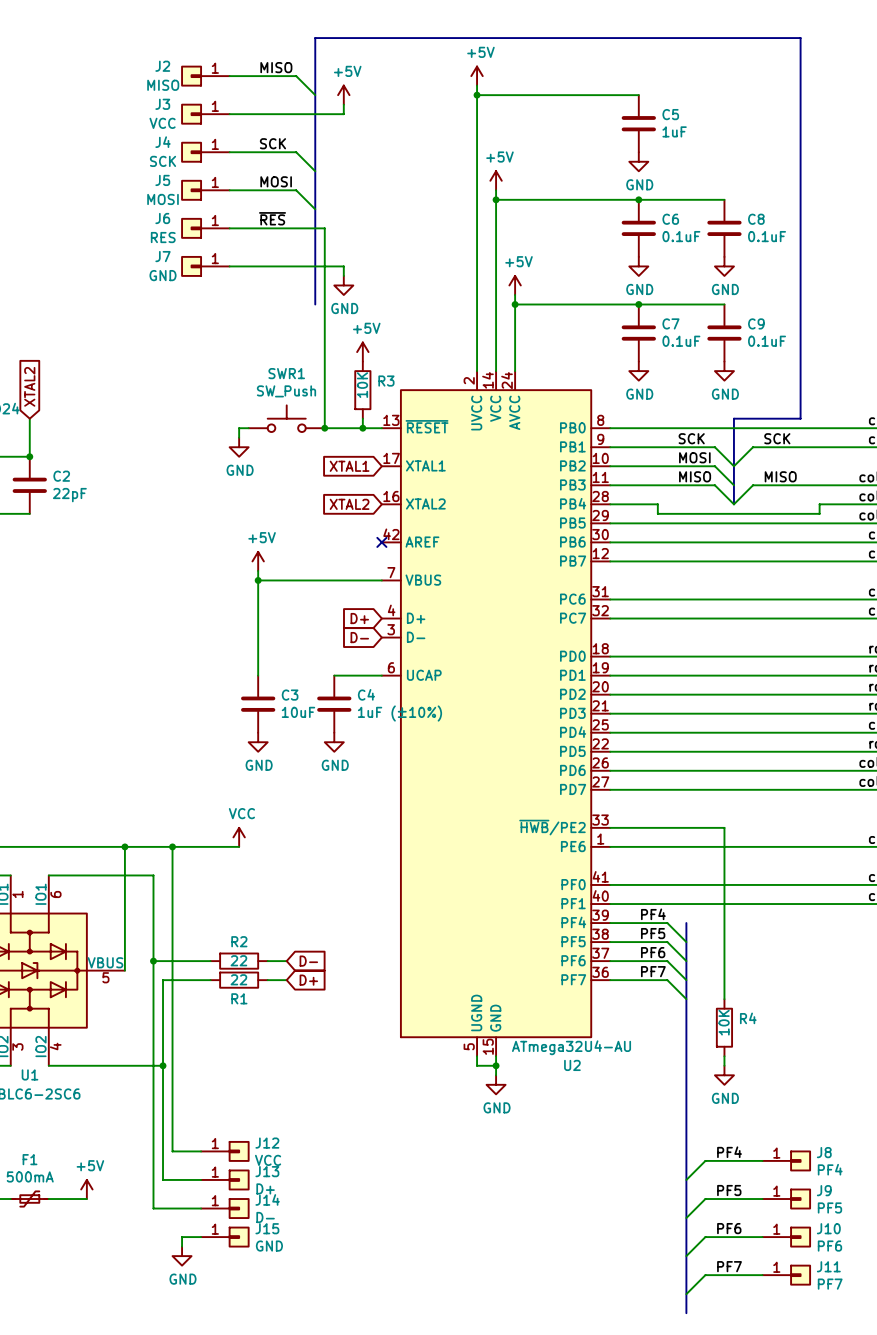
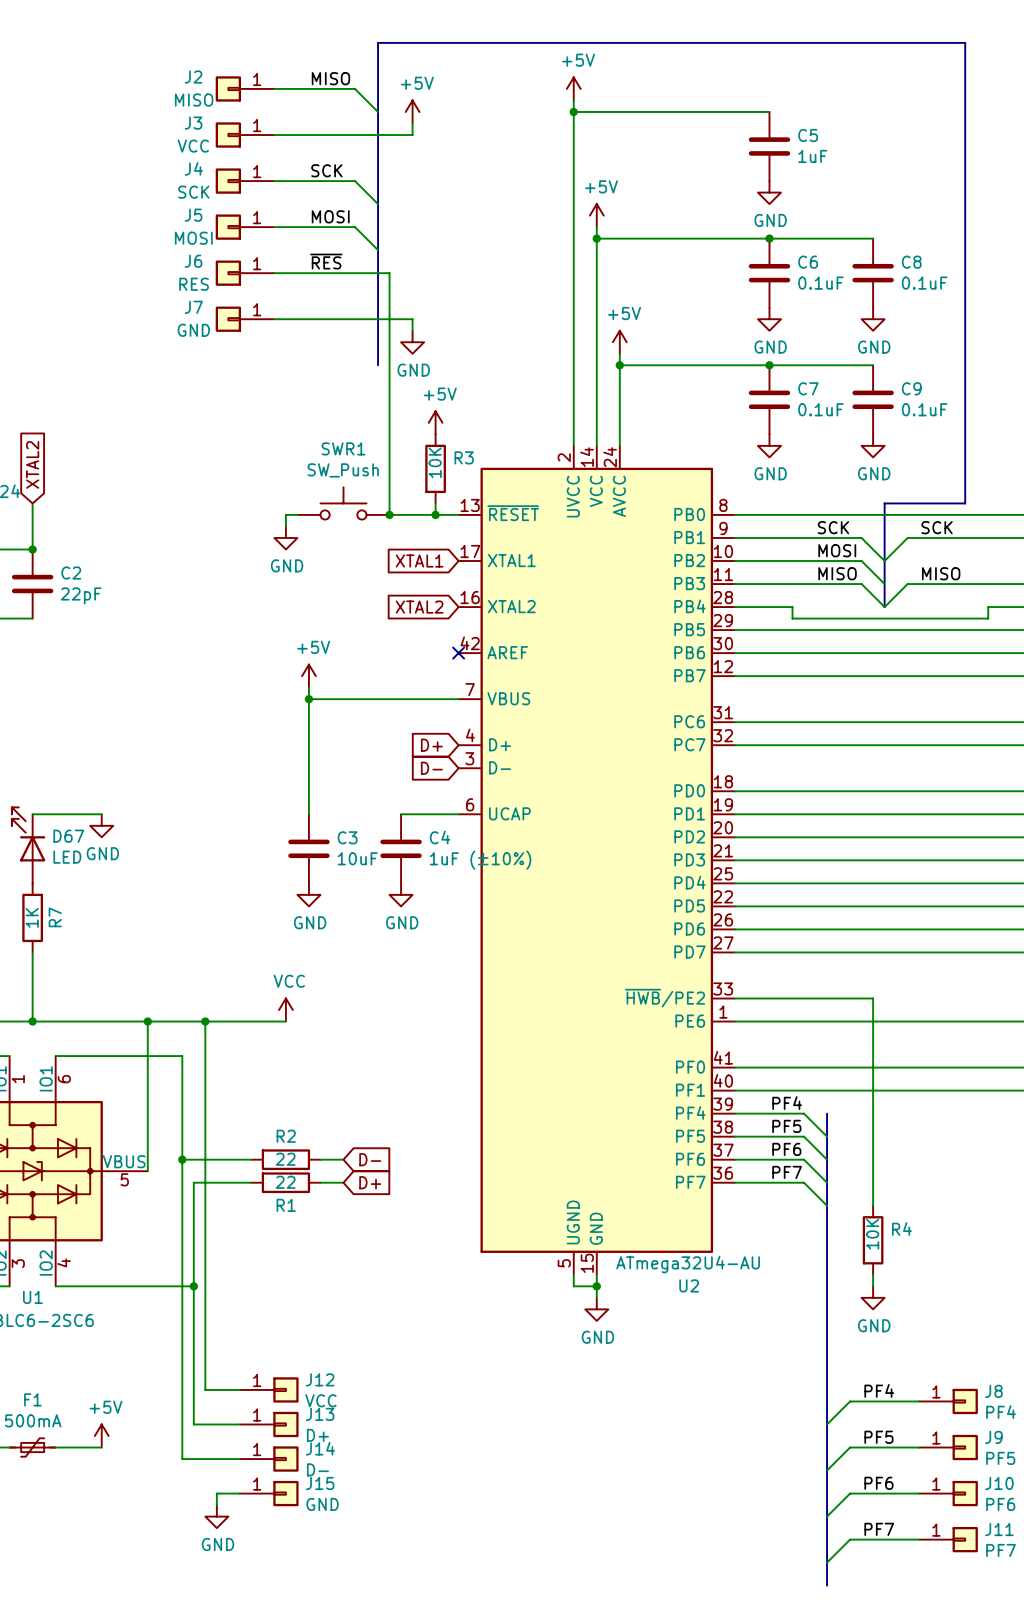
wire: none -> (32, 814) (101, 814)
power symbol: none -> GND (101, 825)
D67: none -> LED (28, 845)
R7: none -> 1K (32, 917)
wire: none -> (32, 952) (32, 1021)
junction: none -> (32, 1021)

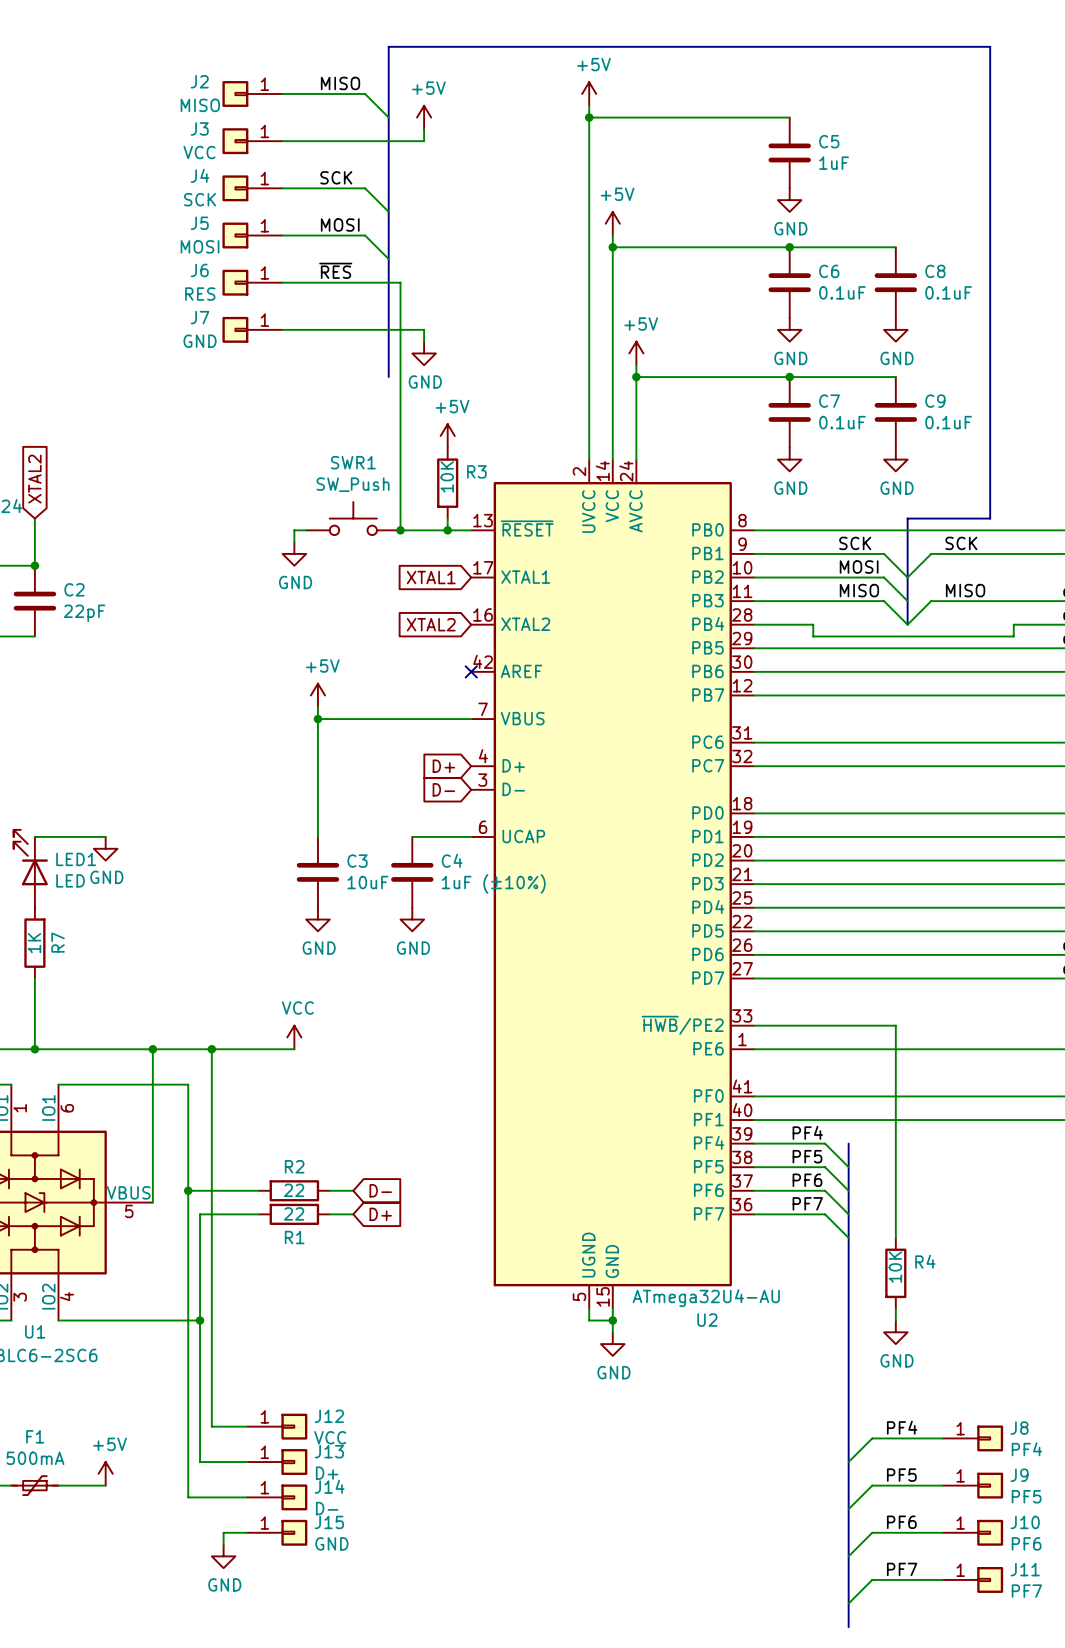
D67 name: D67 (68, 836) -> LED1 (76, 859)

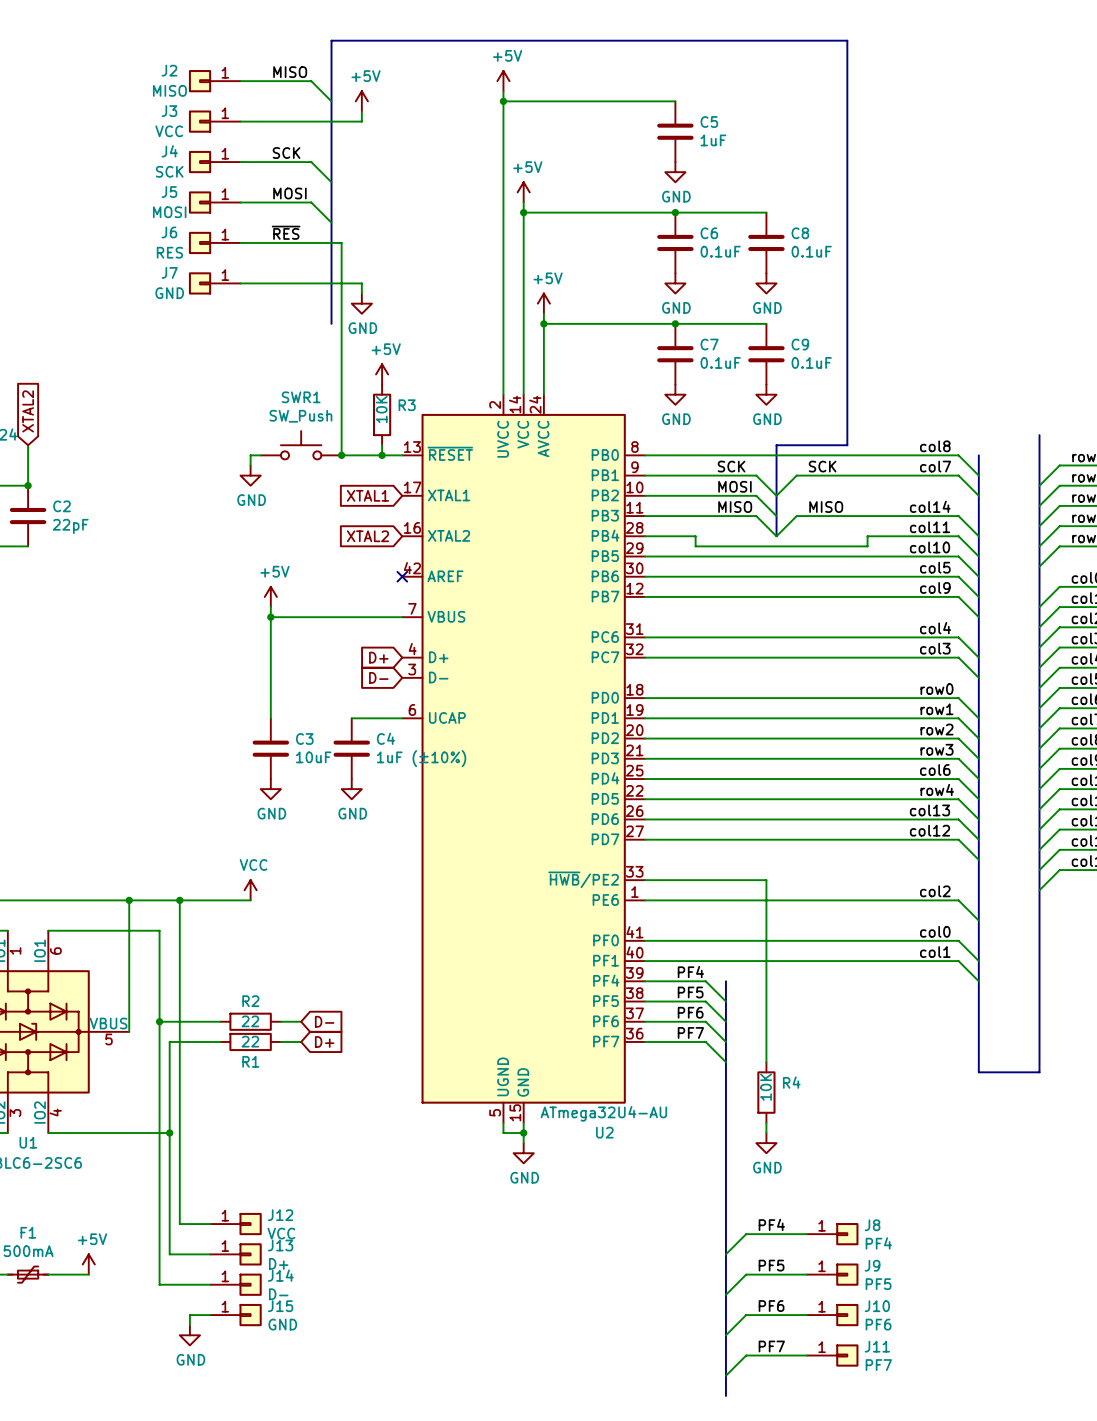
wire: (34, 836) (105, 836) -> none
power symbol: GND (105, 848) -> none
LED1: LED (30, 868) -> none
R7: 1K (34, 943) -> none
wire: (34, 978) (34, 1049) -> none
junction: (34, 1049) -> none

